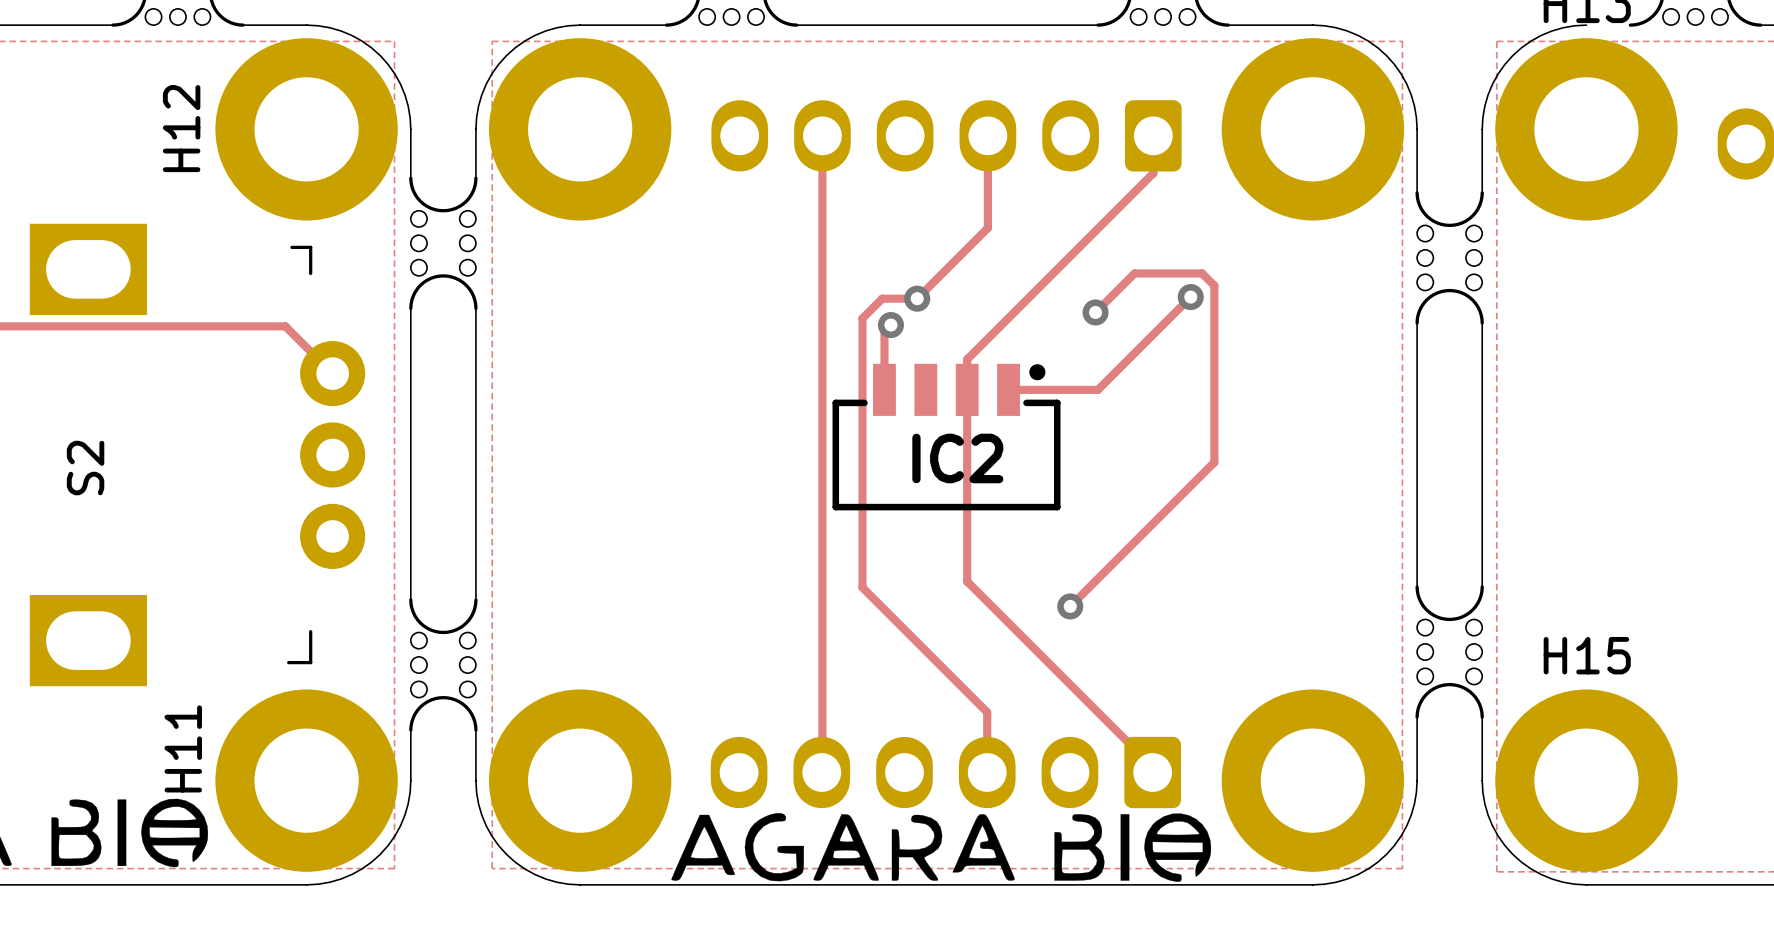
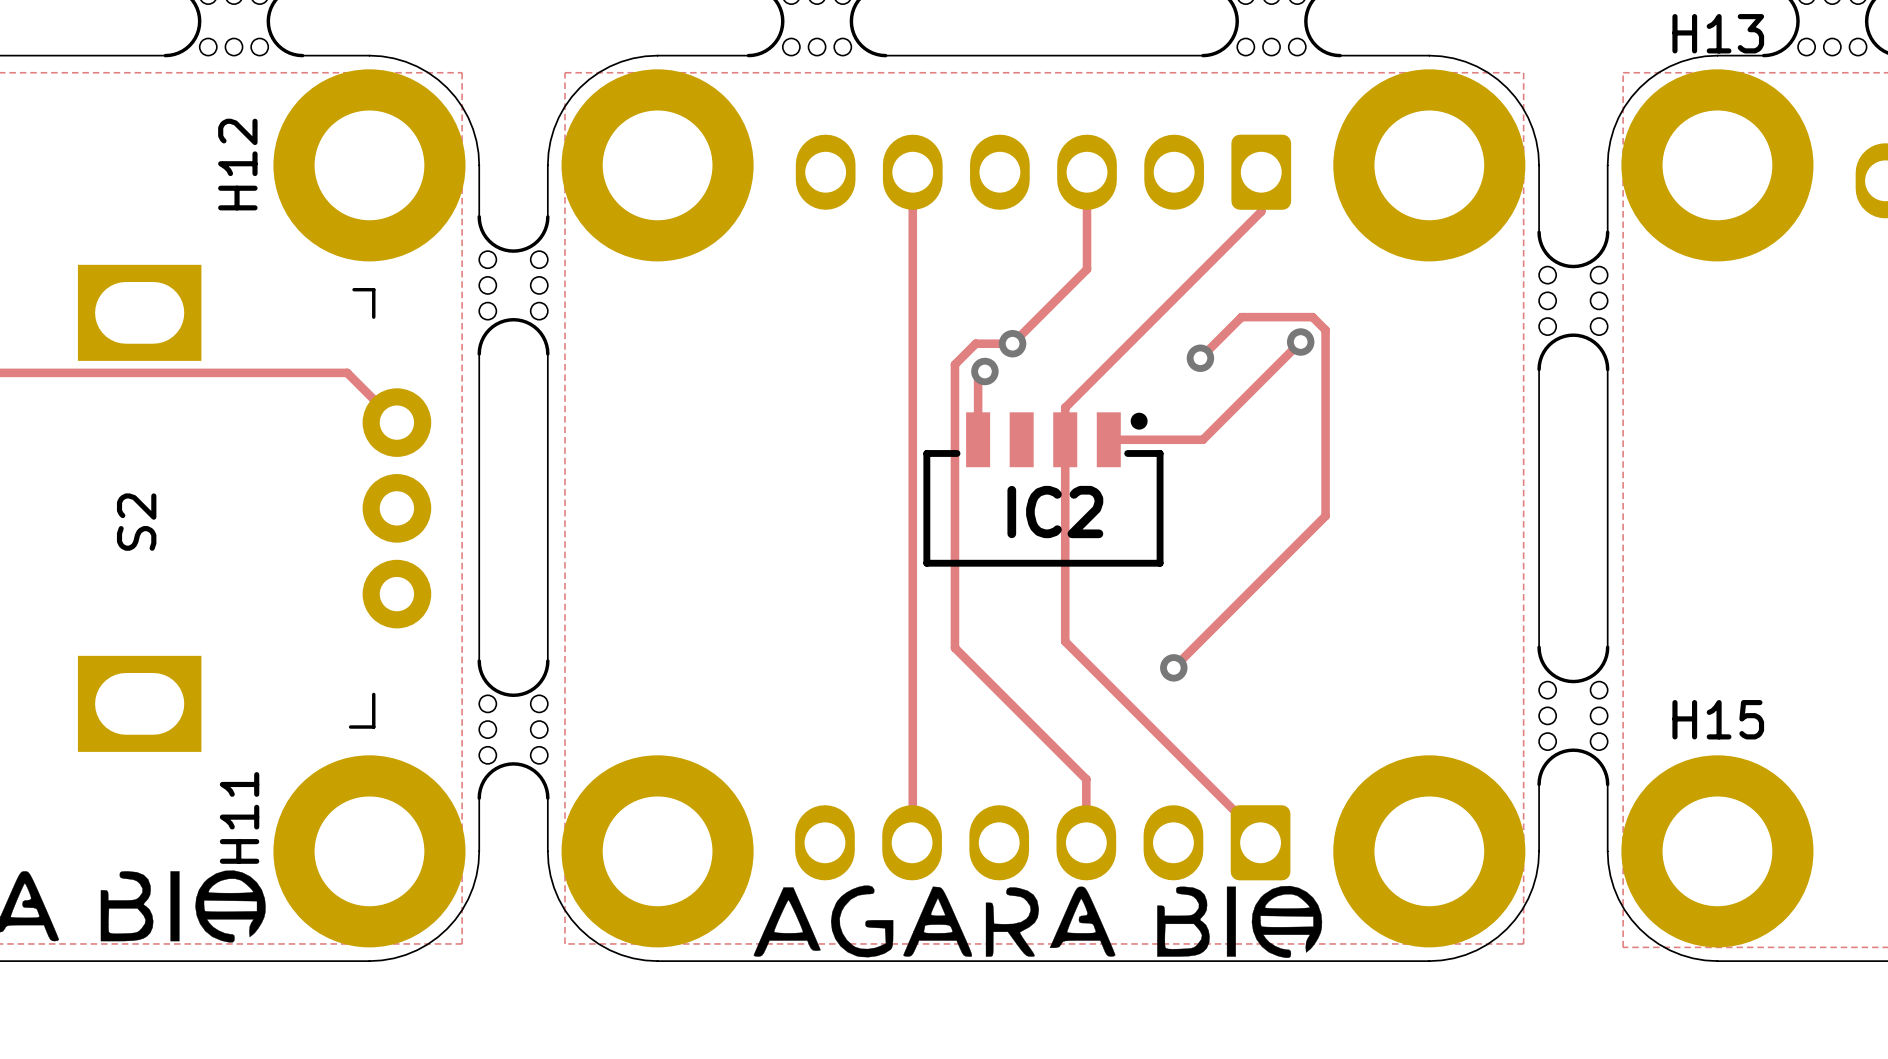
board edge: none -> (1717, 55) (1763, 55)

